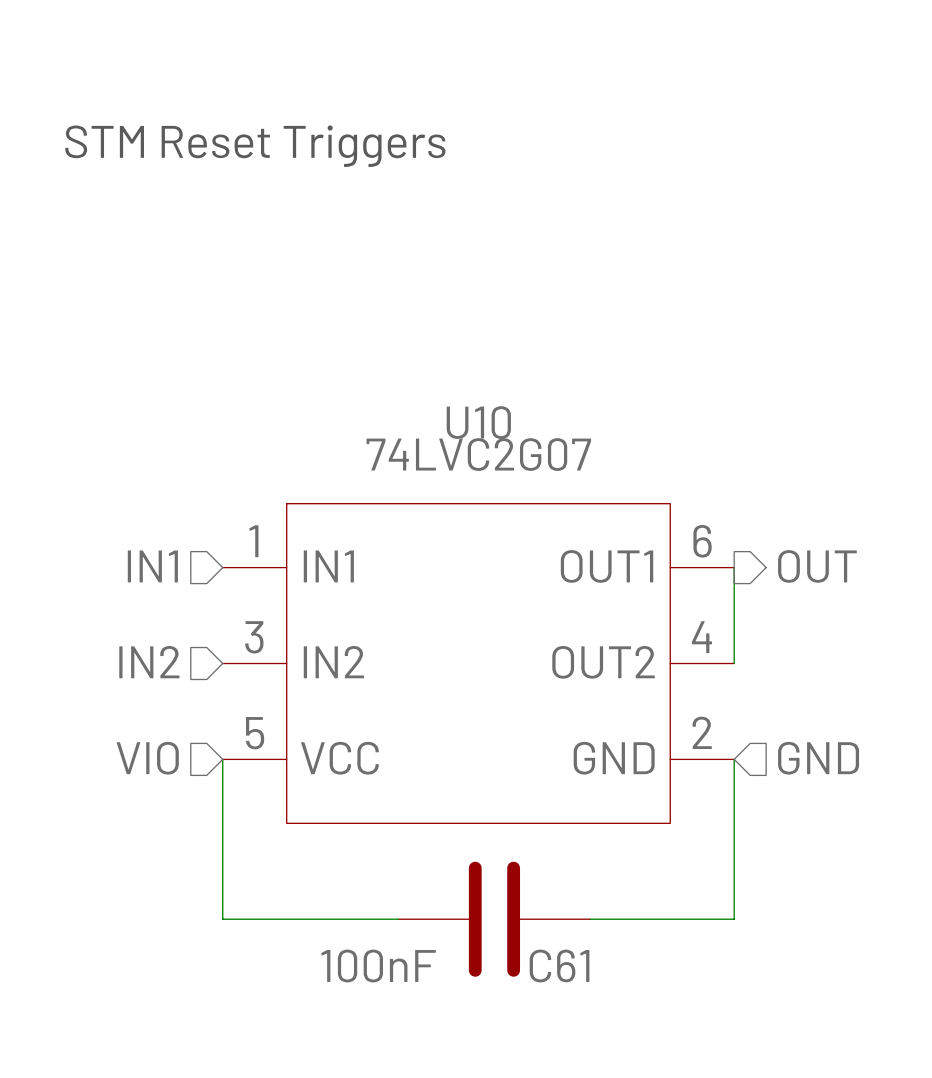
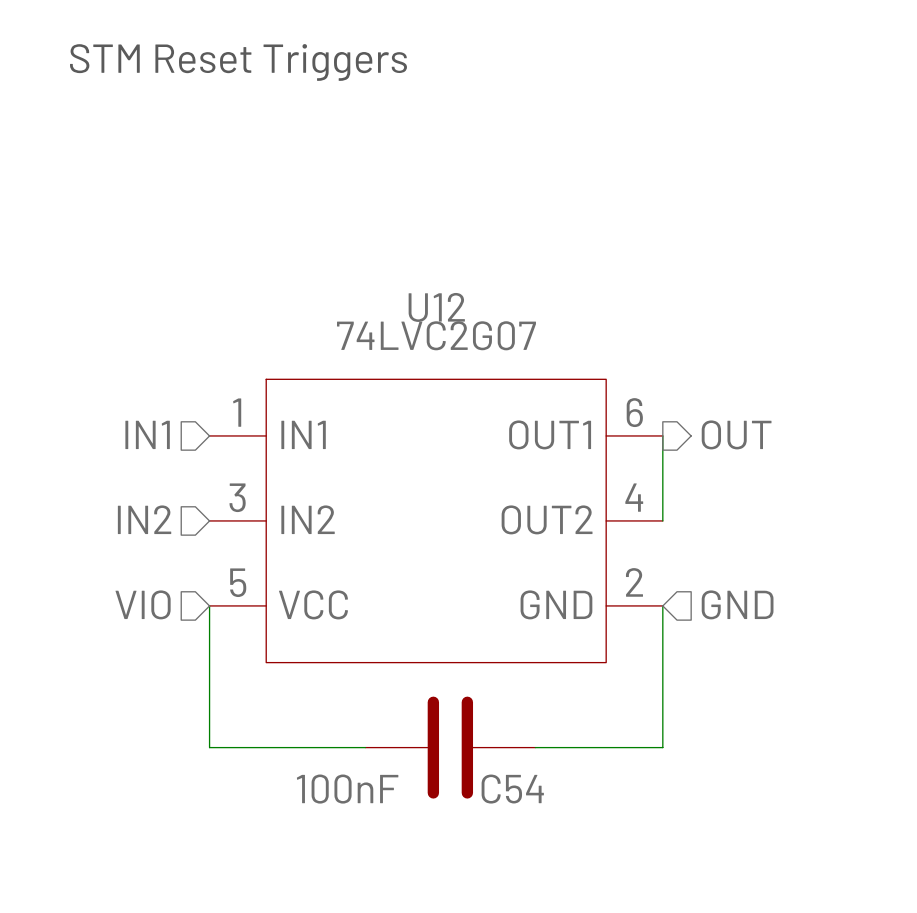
U10 name: U10 (478, 422) -> U12 (436, 307)
C61 name: C61 (559, 966) -> C54 (512, 789)

